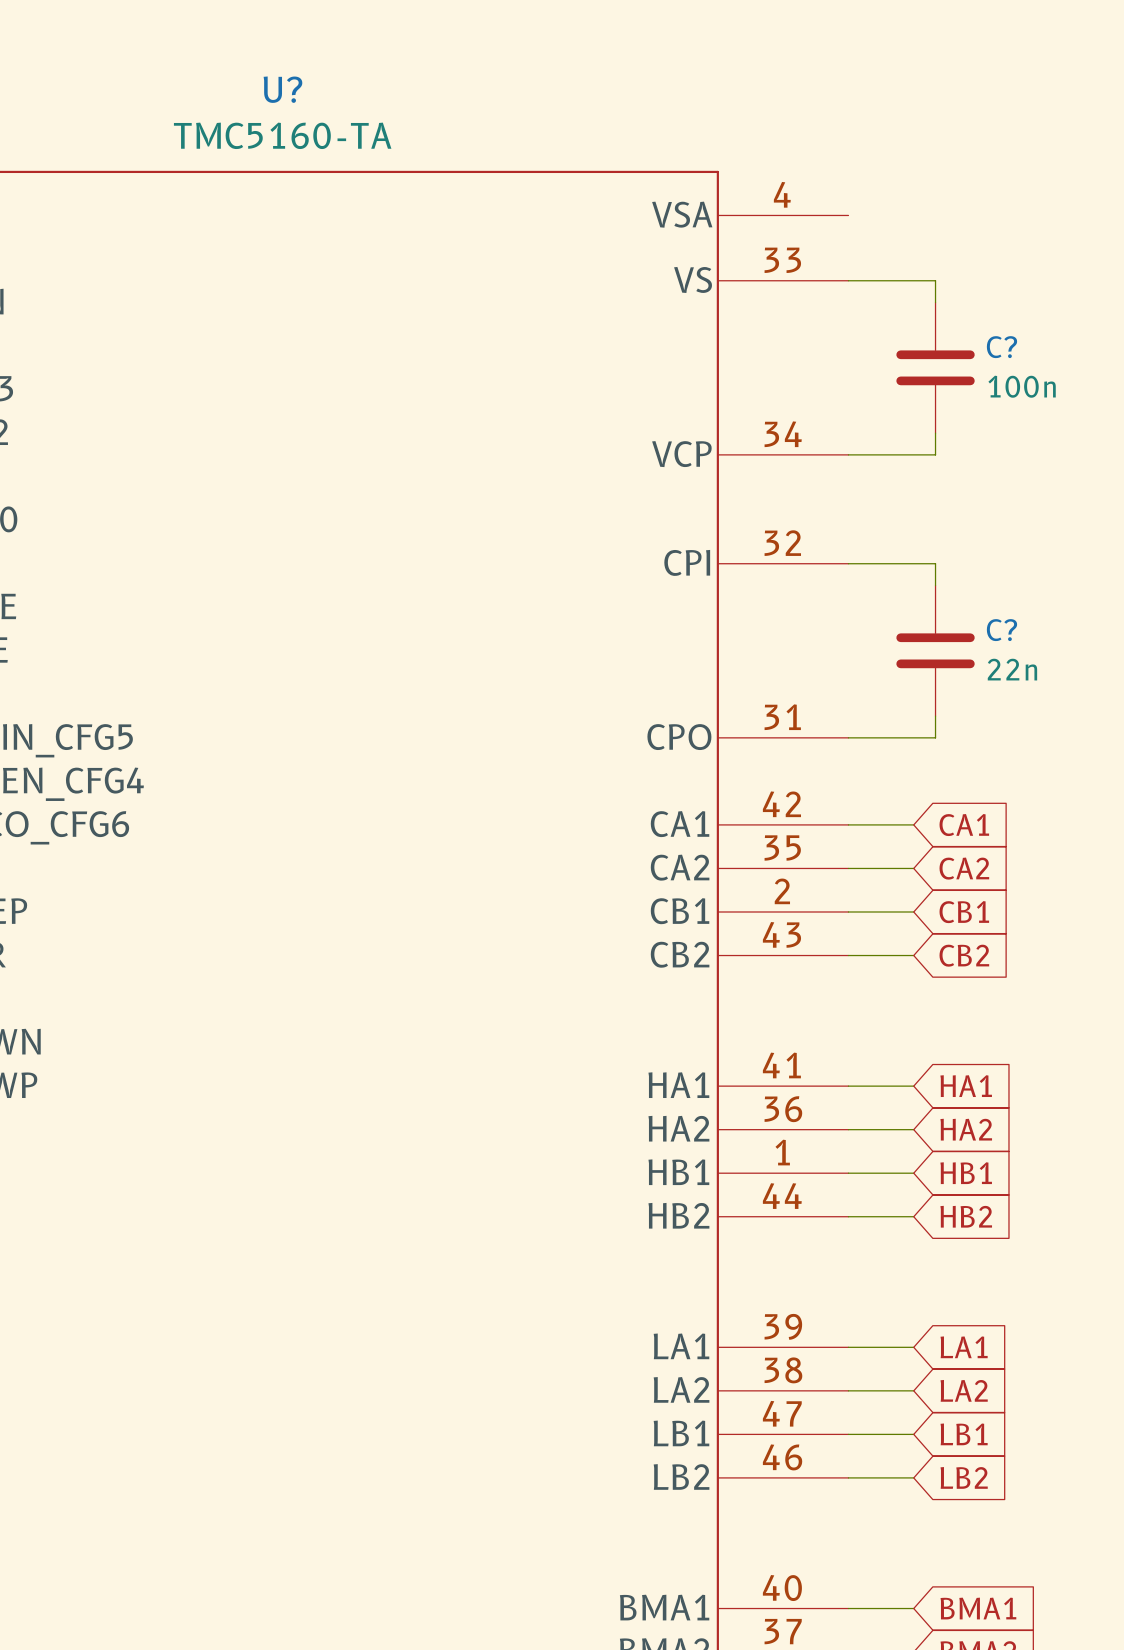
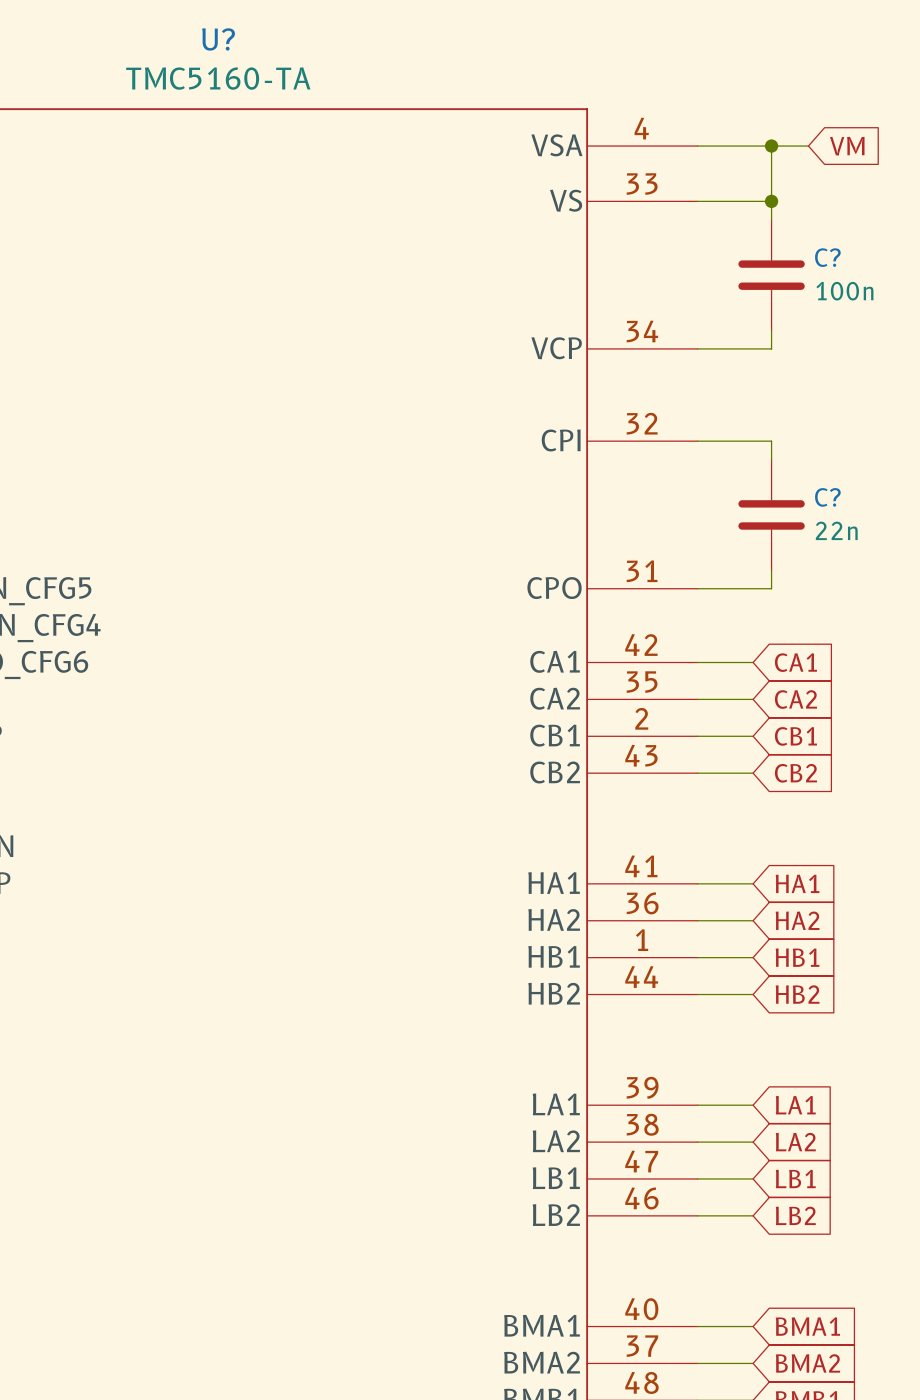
wire: none -> (697, 146) (808, 146)
wire: none -> (771, 146) (771, 201)
junction: none -> (771, 146)
global label: none -> VM (847, 146)
junction: none -> (771, 201)

